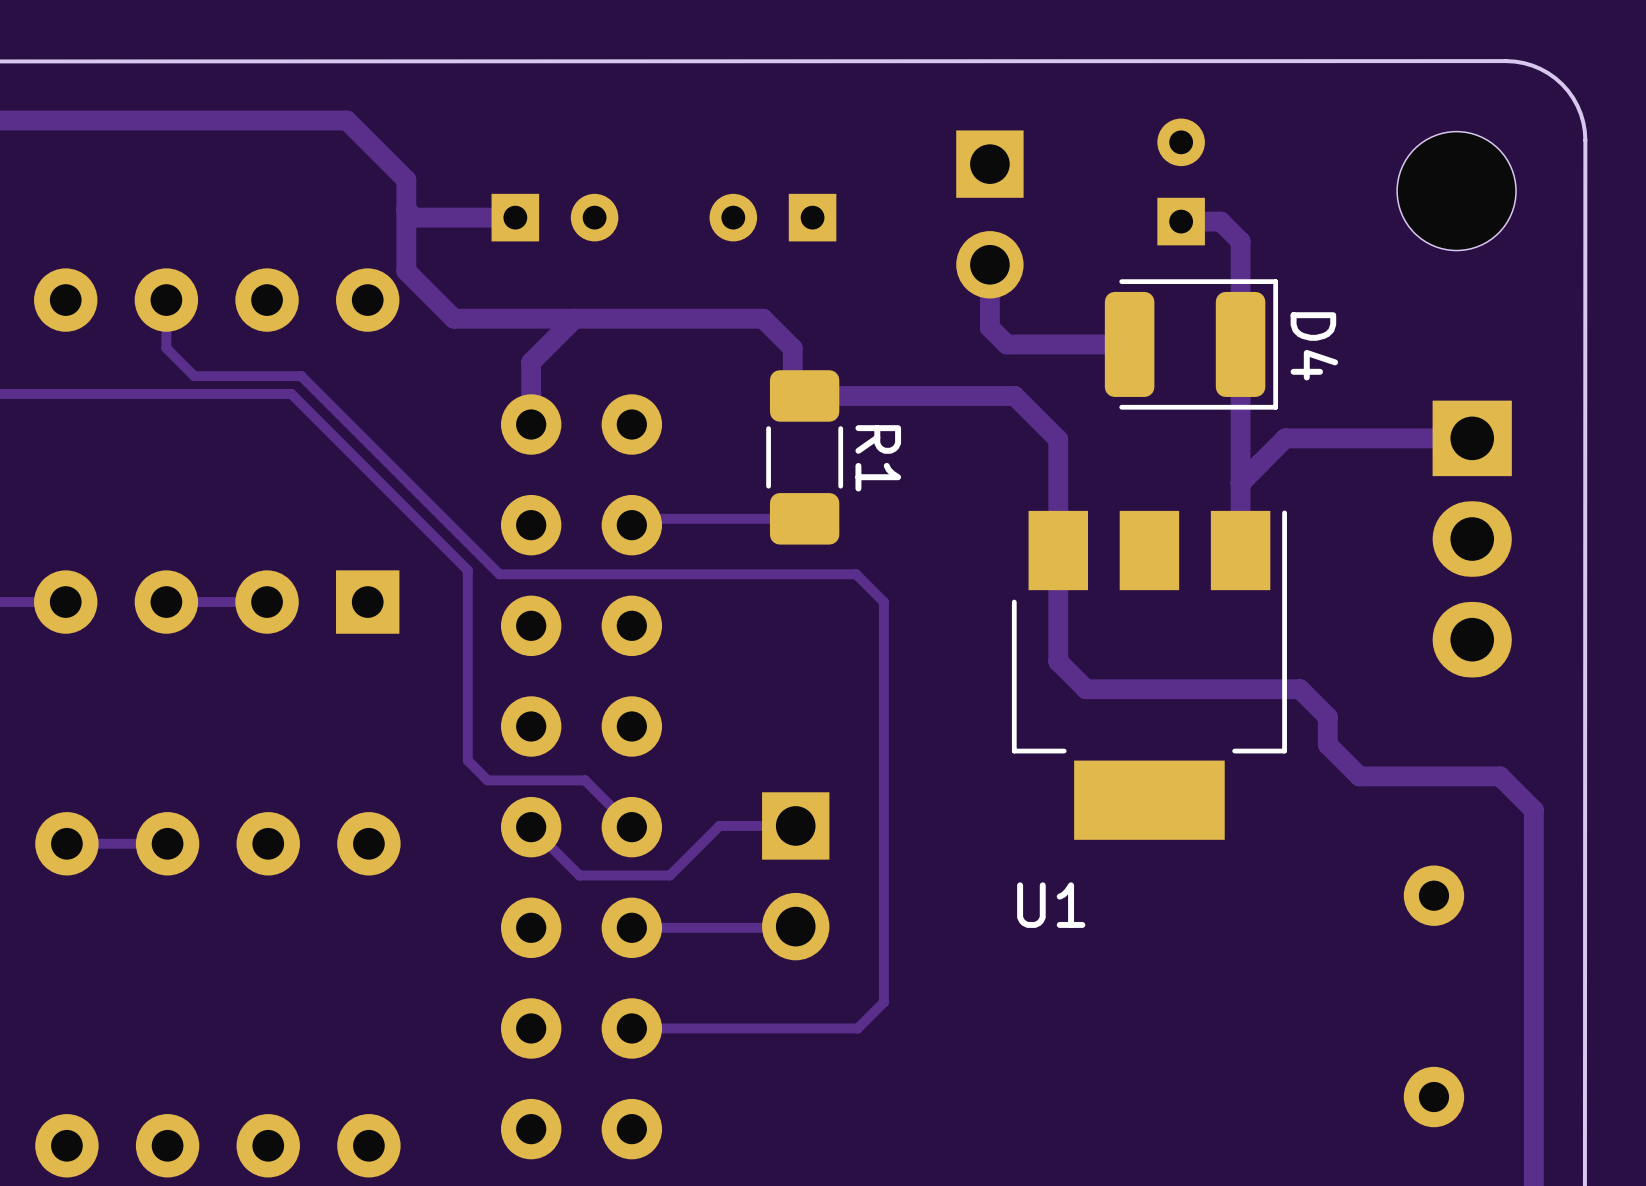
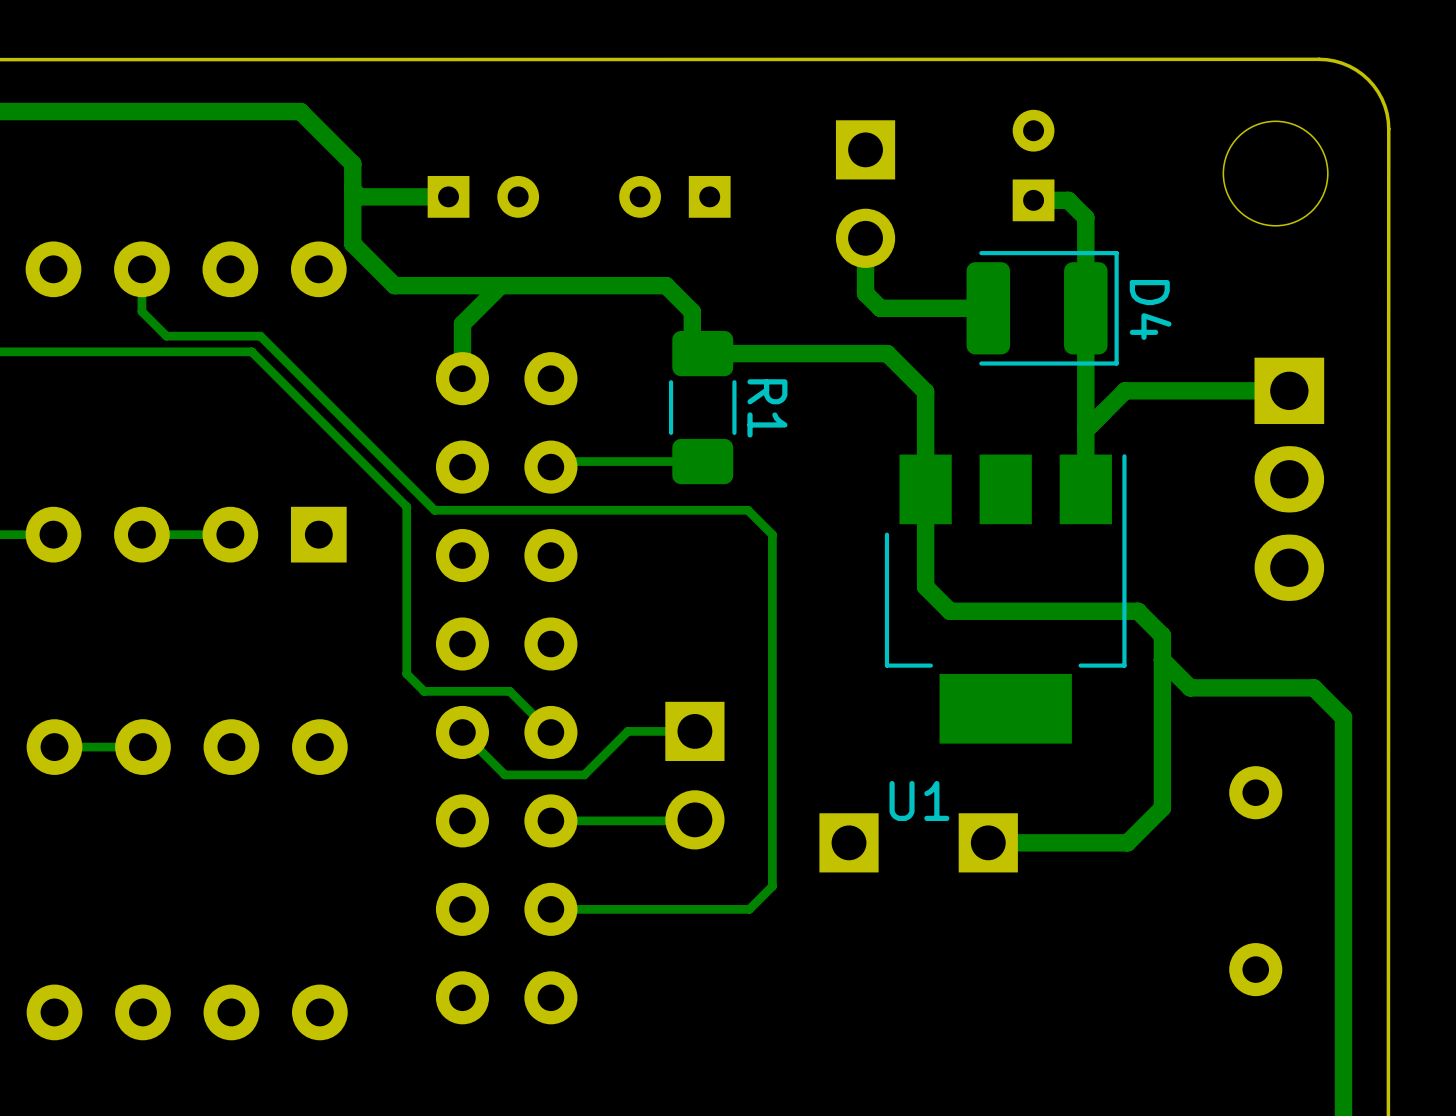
track: none -> (1162, 660) (1162, 808) (1127, 842) (988, 842)
part: none -> (849, 842)
part: none -> (988, 842)

